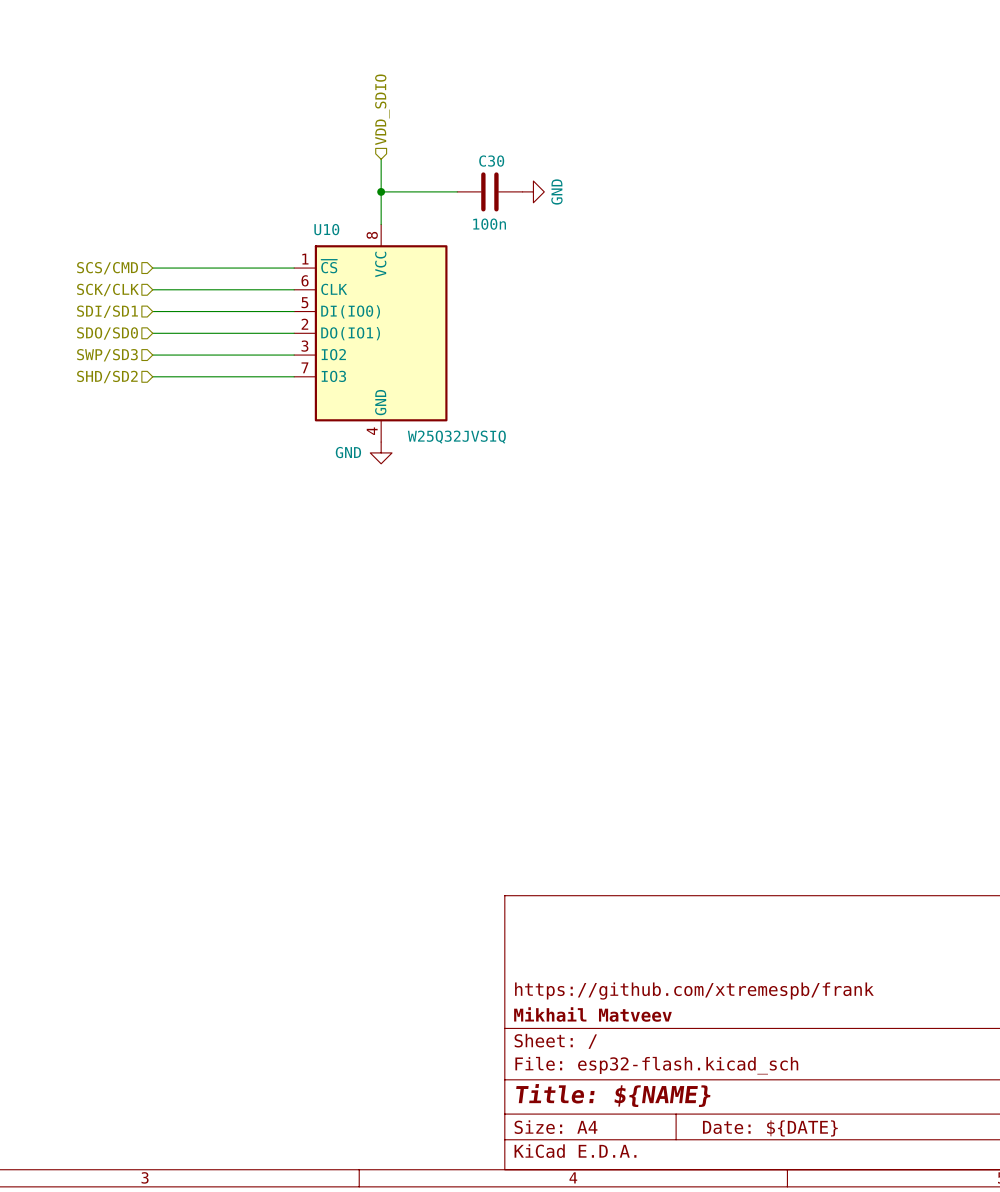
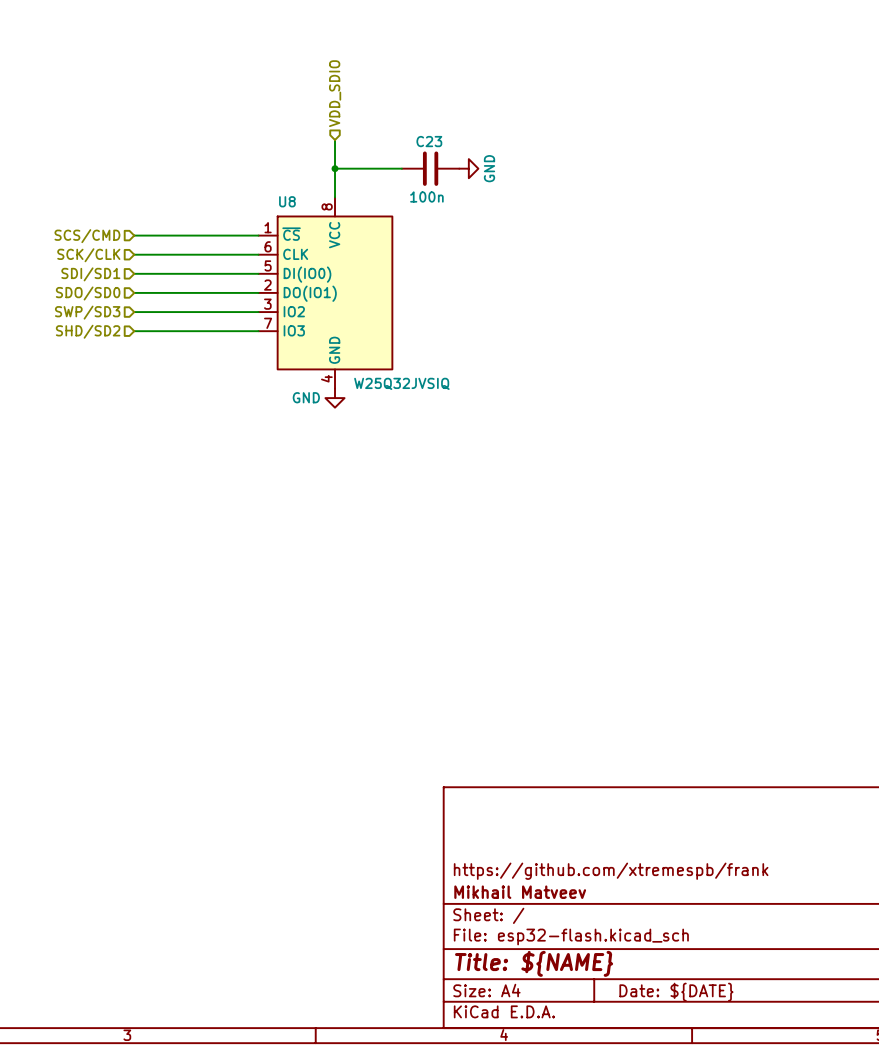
C30 name: C30 (491, 161) -> C23 (429, 141)
U10 name: U10 (326, 229) -> U8 (287, 201)

